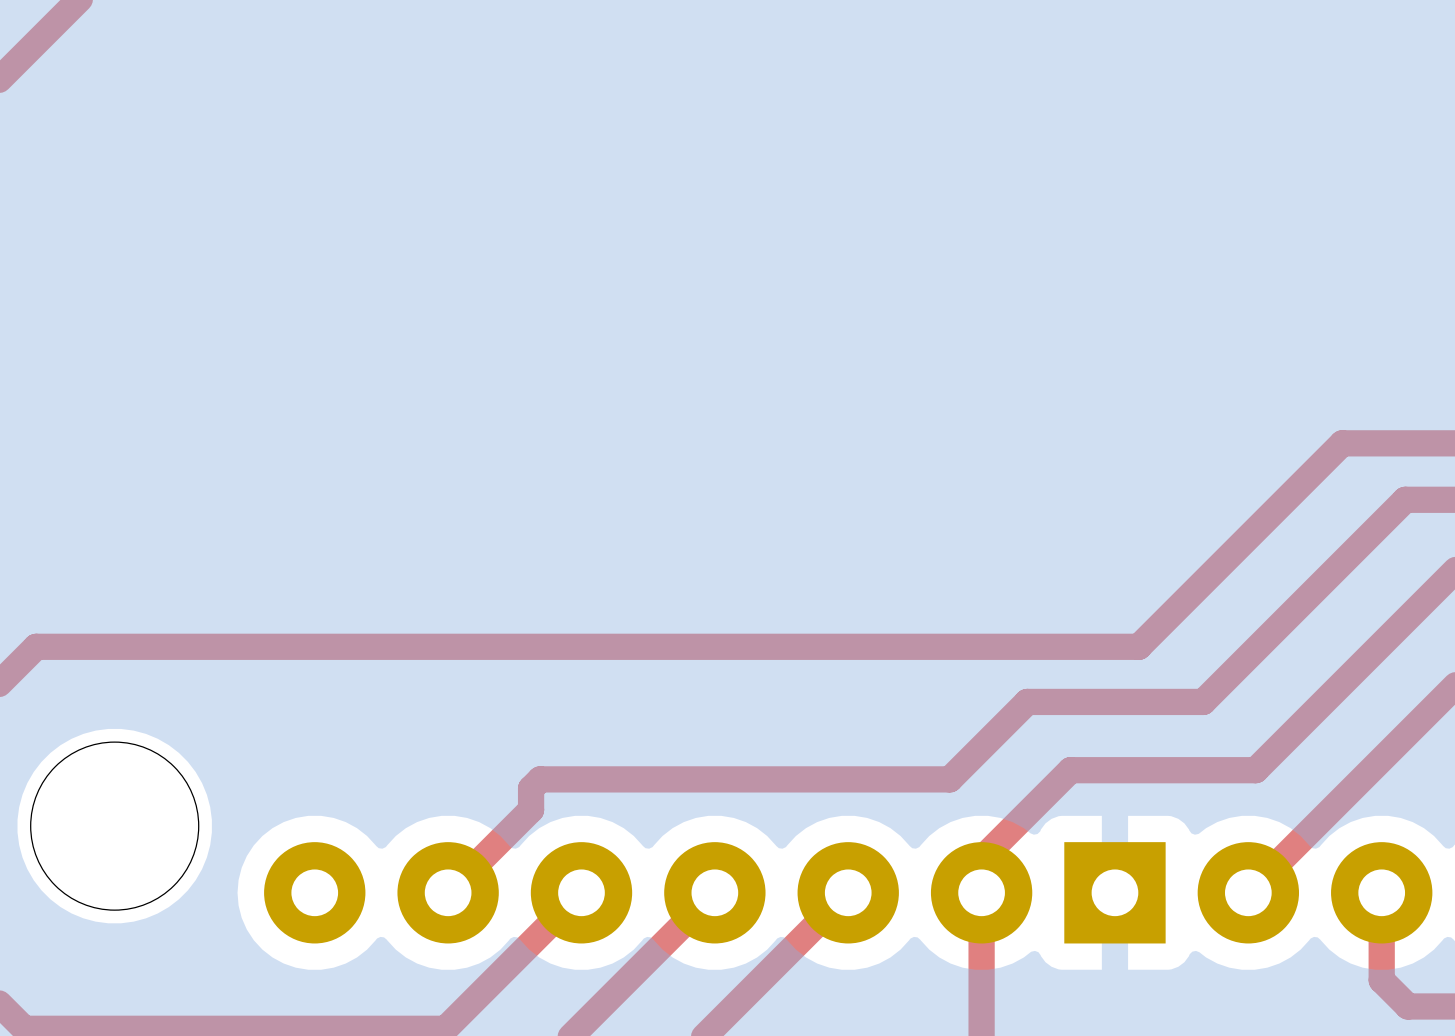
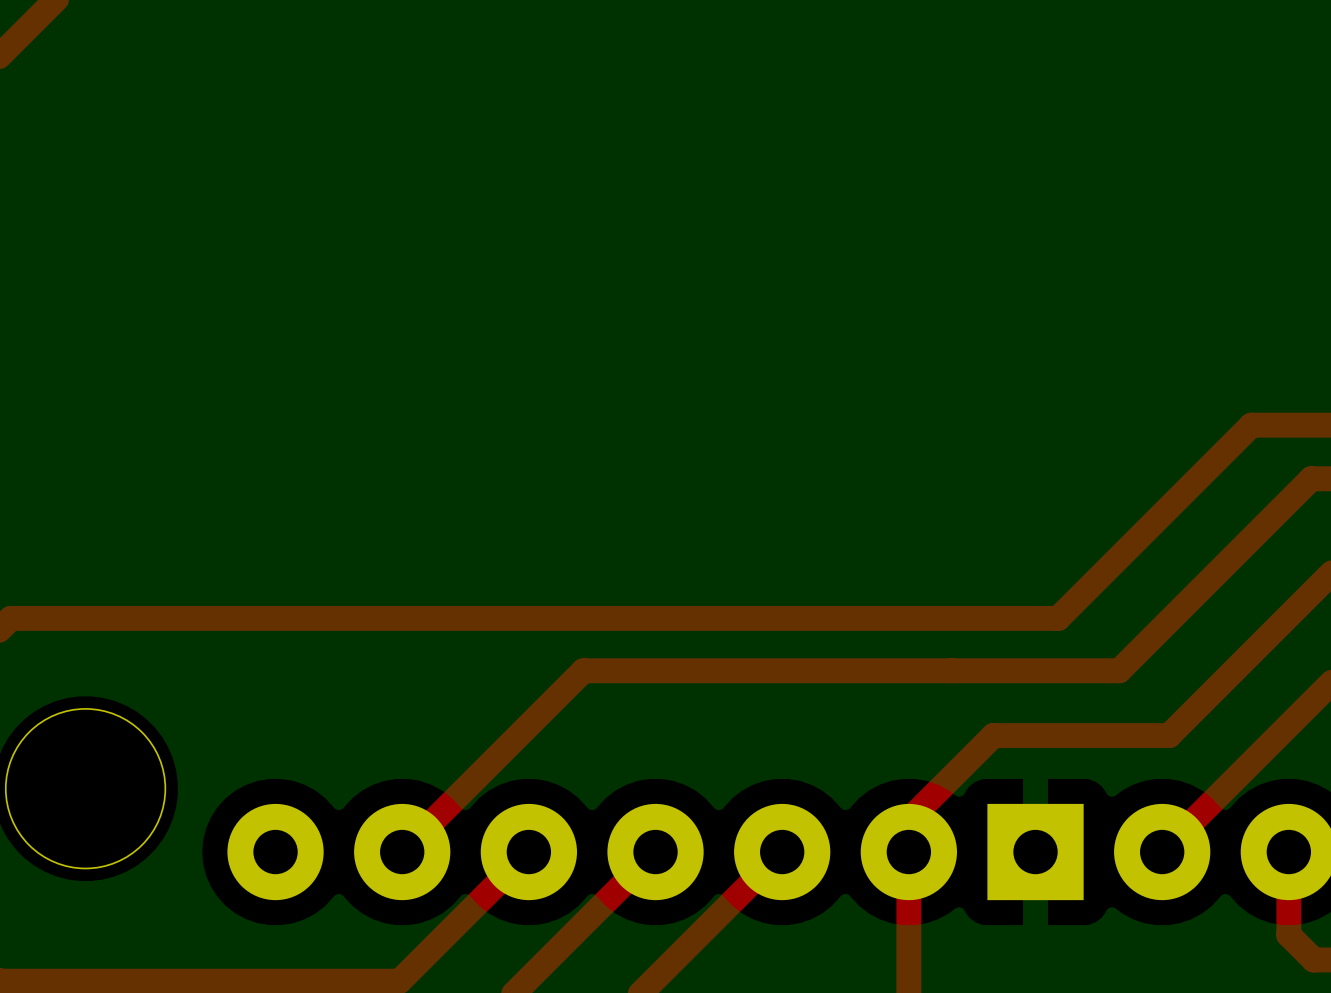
top track: (1027, 701) (949, 779) (540, 779) (531, 788) (531, 809) -> (952, 670) (583, 670) (481, 773)

